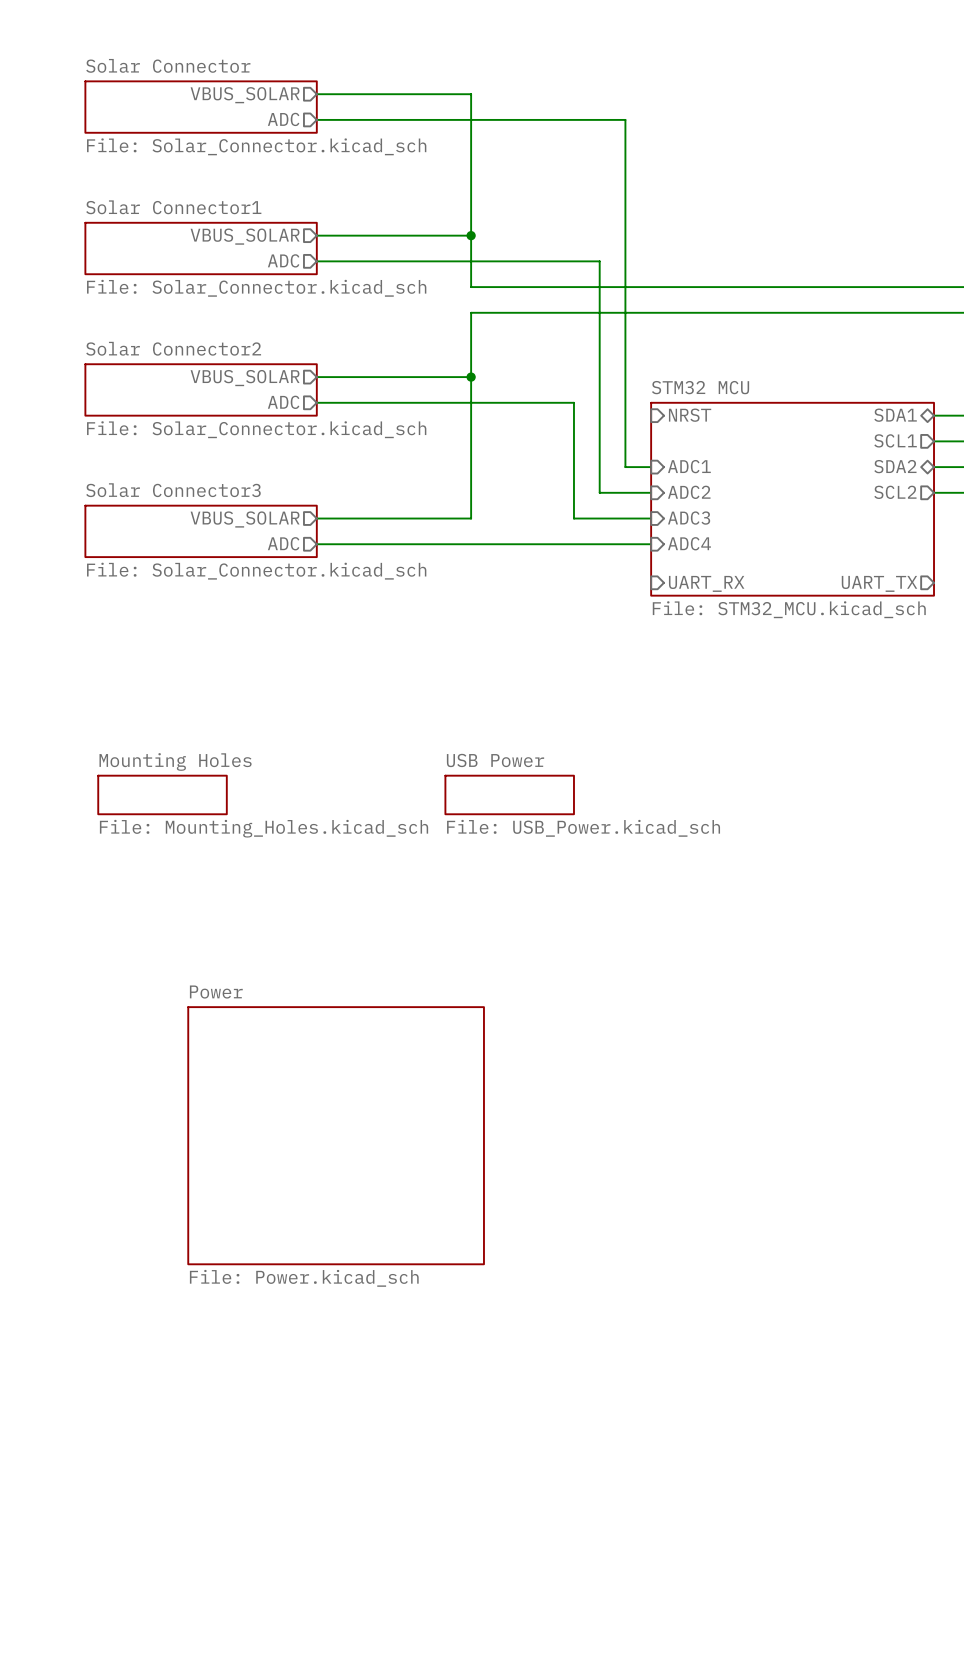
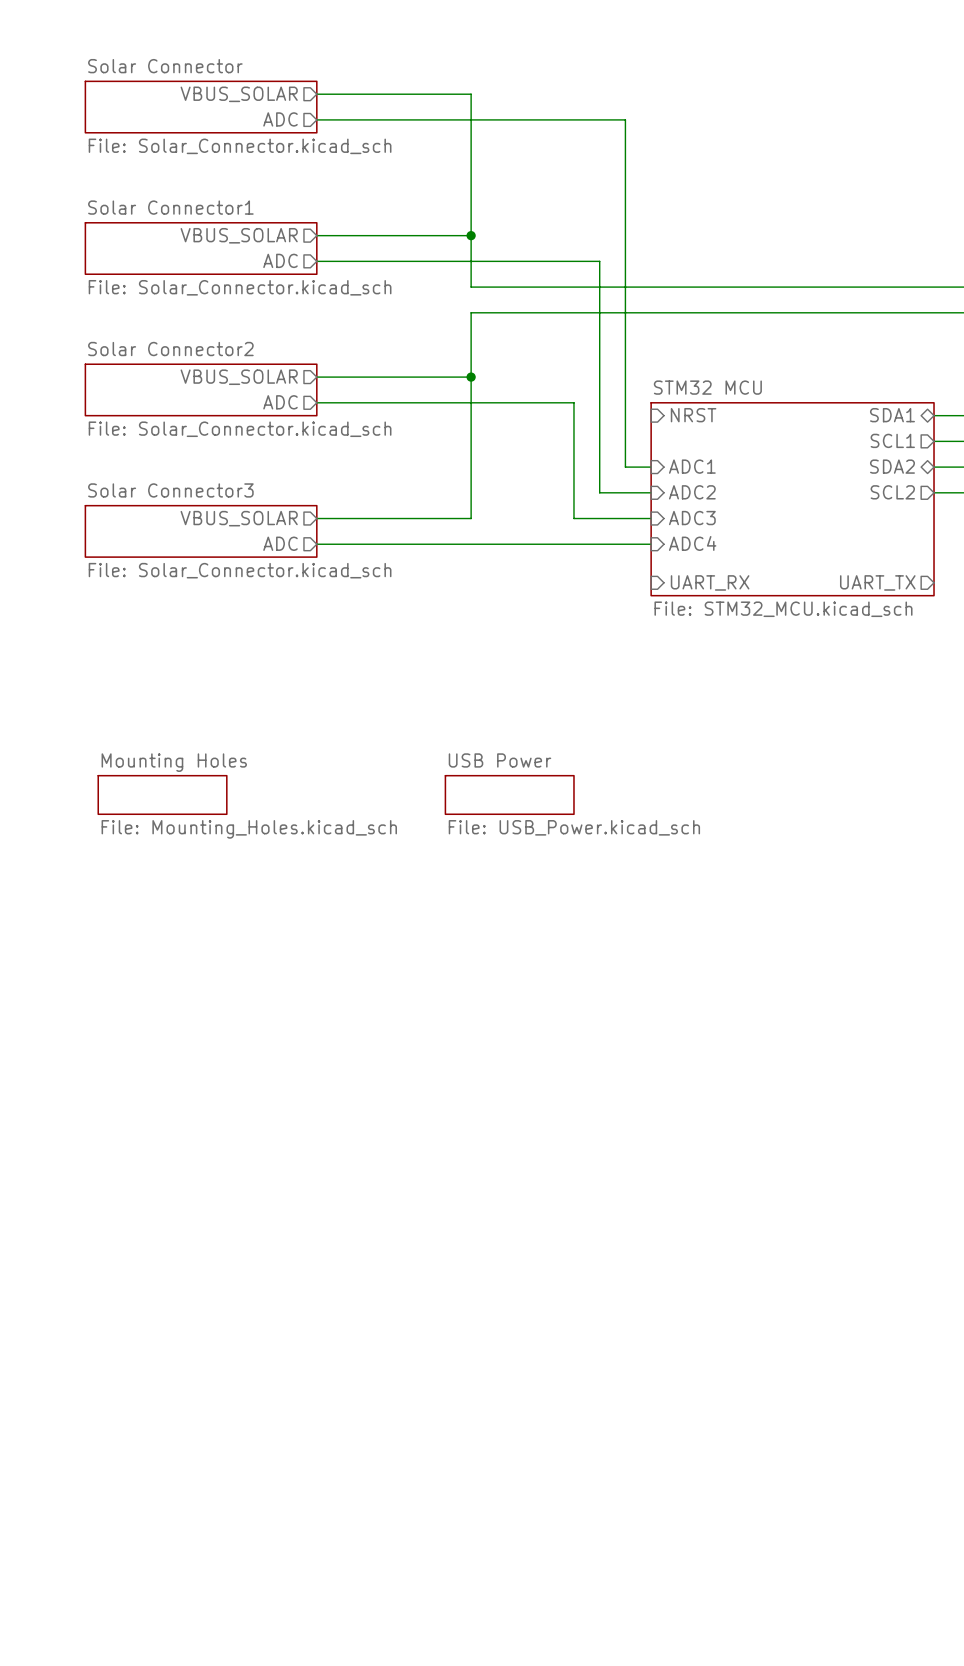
sheet Power: File: Power.kicad_sch (336, 1135) -> none

